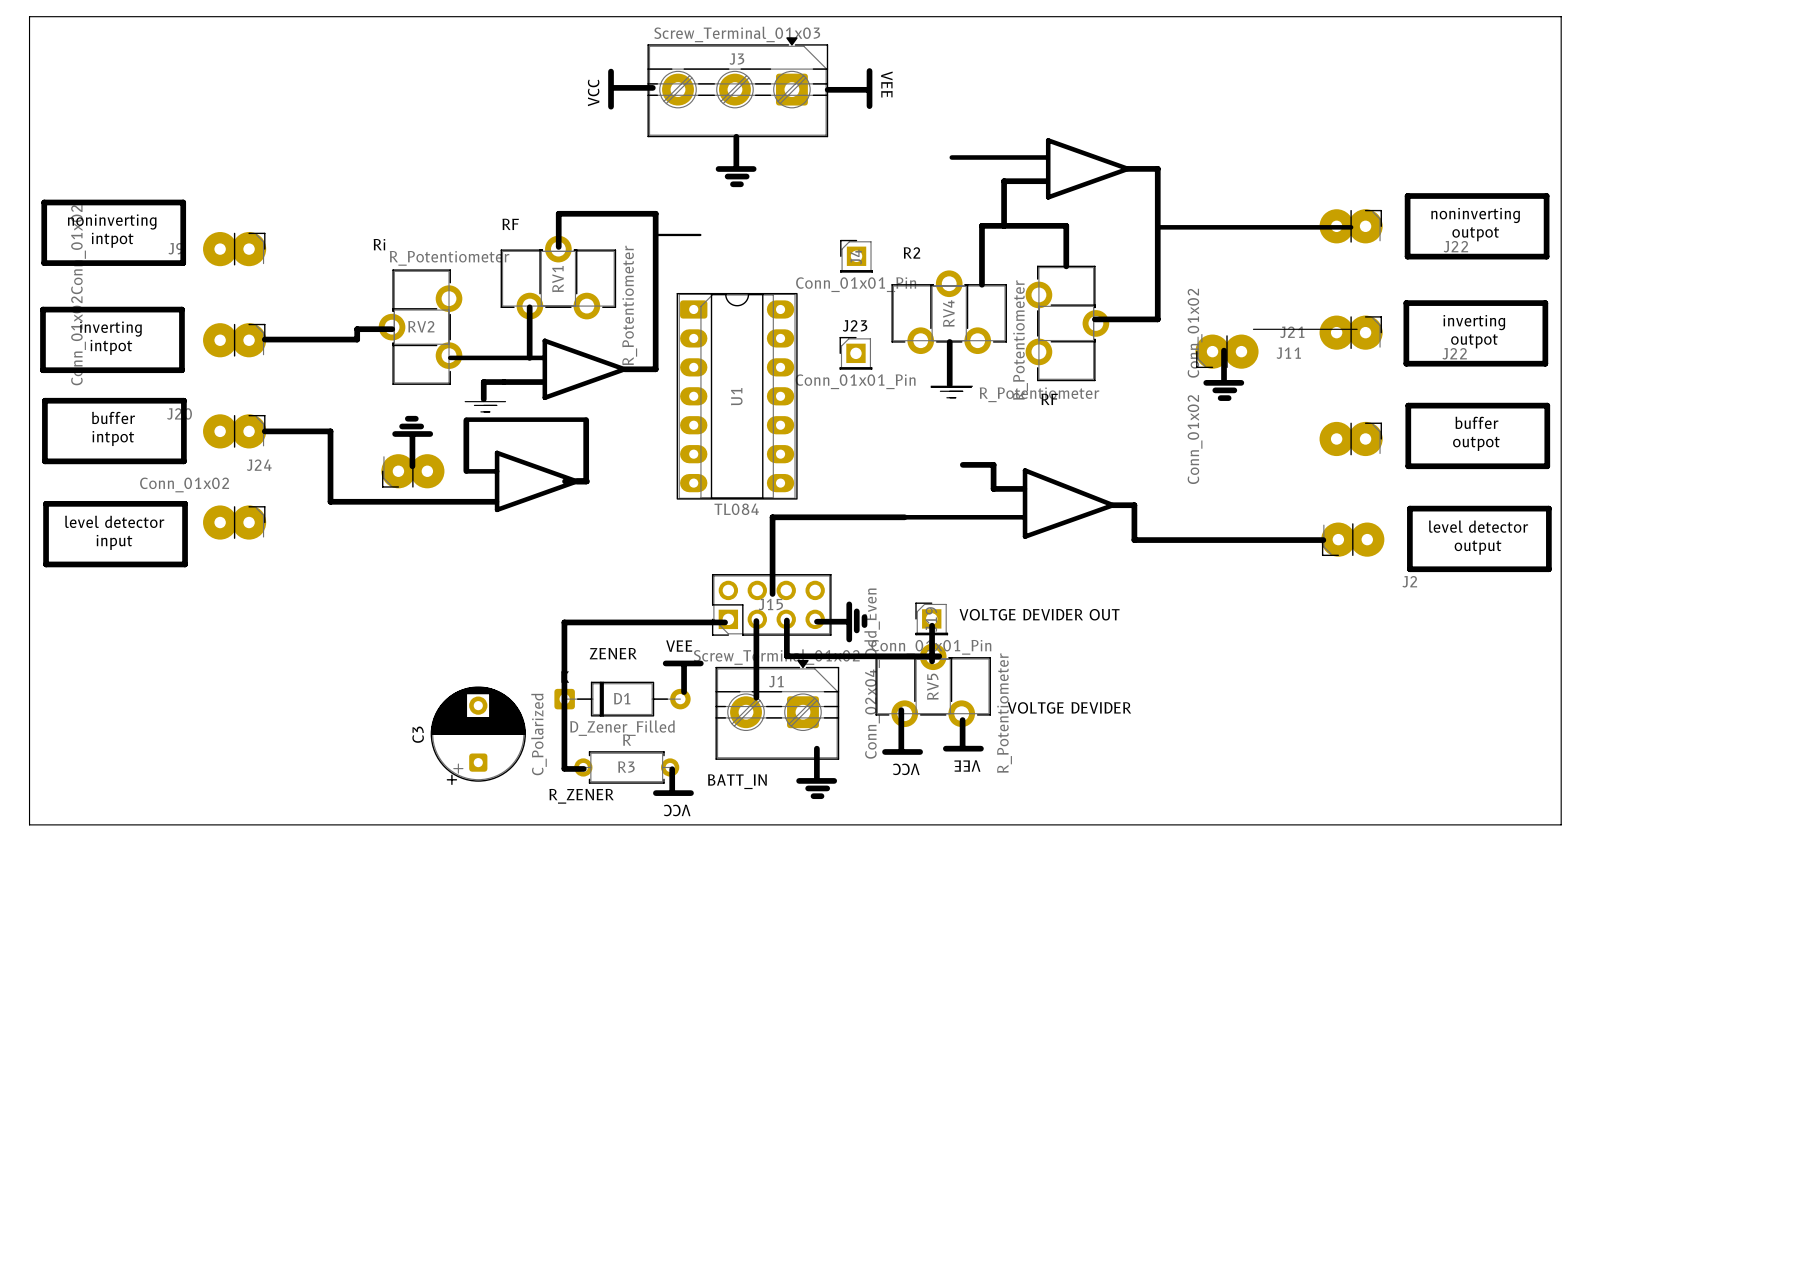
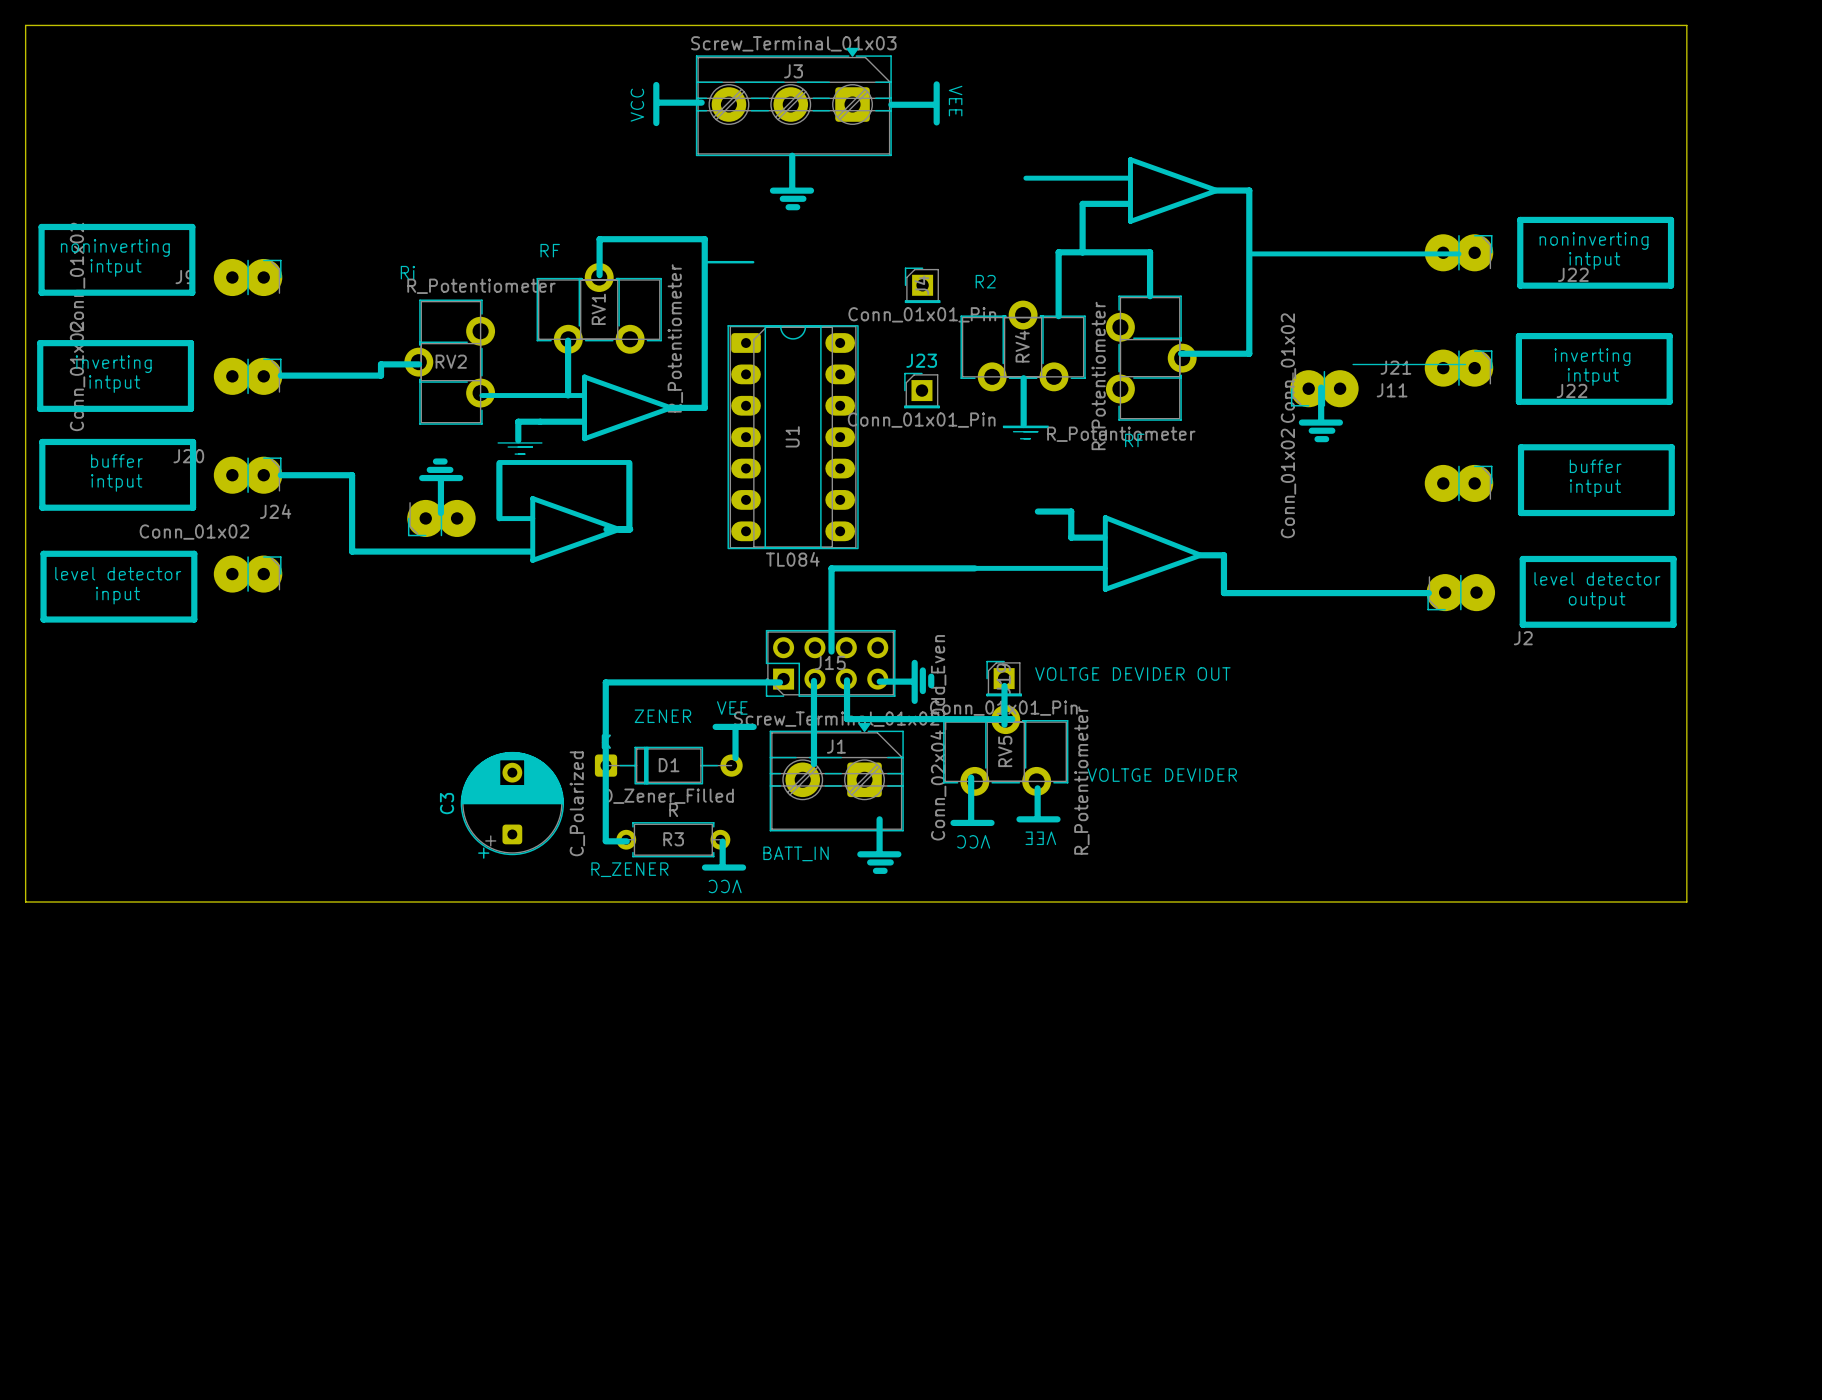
text: outpot (1475, 234) -> intput (1594, 260)
text: intpot (112, 240) -> intput (115, 267)
text: outpot (1474, 341) -> intput (1593, 377)
text: intpot (111, 347) -> intput (114, 384)
text: intpot (113, 438) -> intput (116, 482)
text: outpot (1476, 443) -> intput (1595, 488)

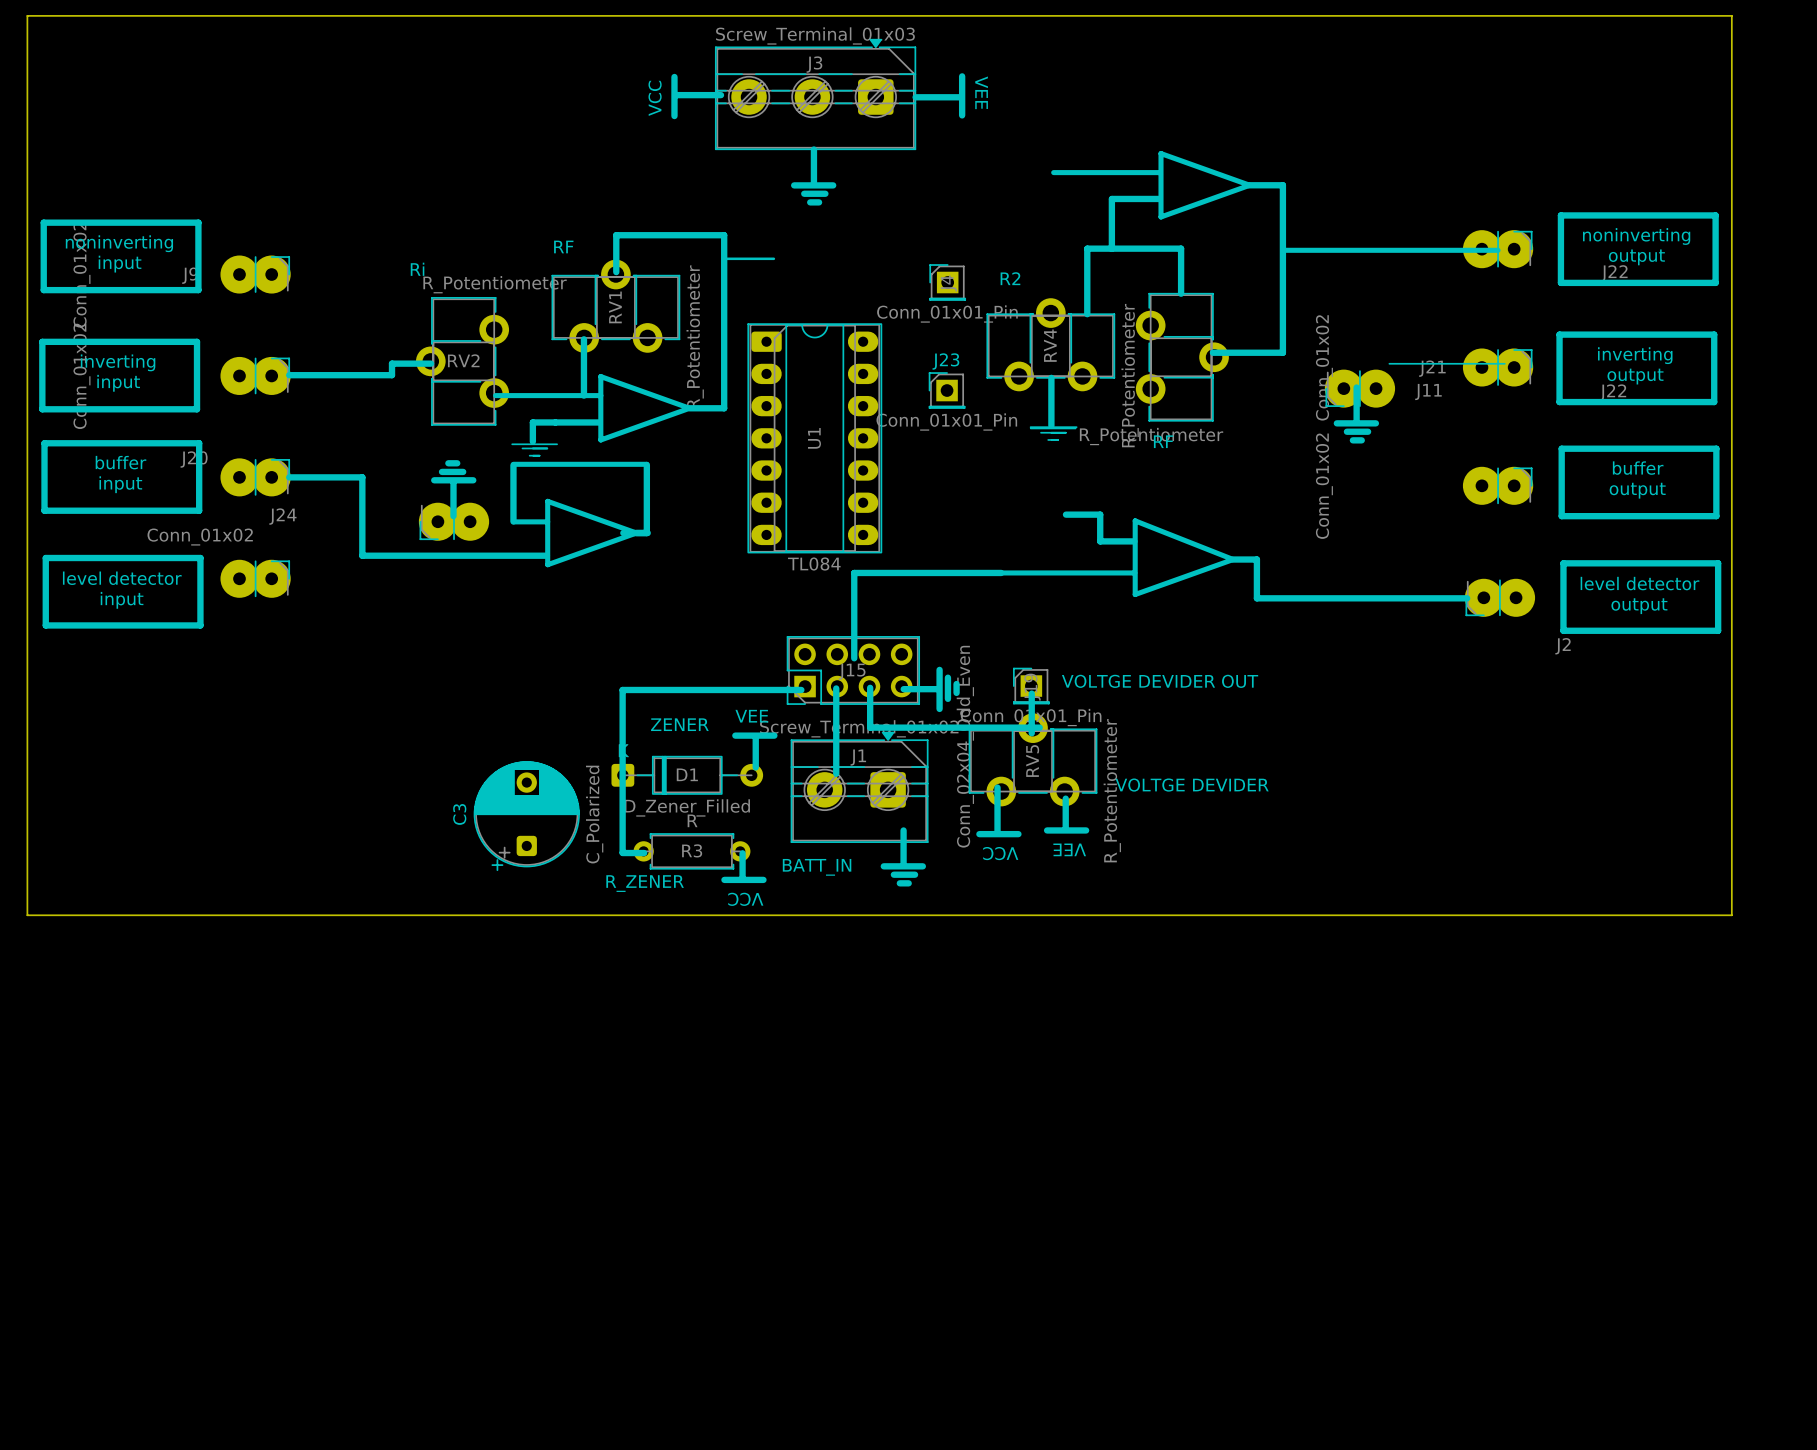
text: intput (1594, 260) -> output (1636, 257)
text: intput (115, 267) -> input (120, 264)
text: intput (1593, 377) -> output (1635, 376)
text: intput (114, 384) -> input (118, 383)
text: intput (116, 482) -> input (120, 484)
text: intput (1595, 488) -> output (1637, 490)

